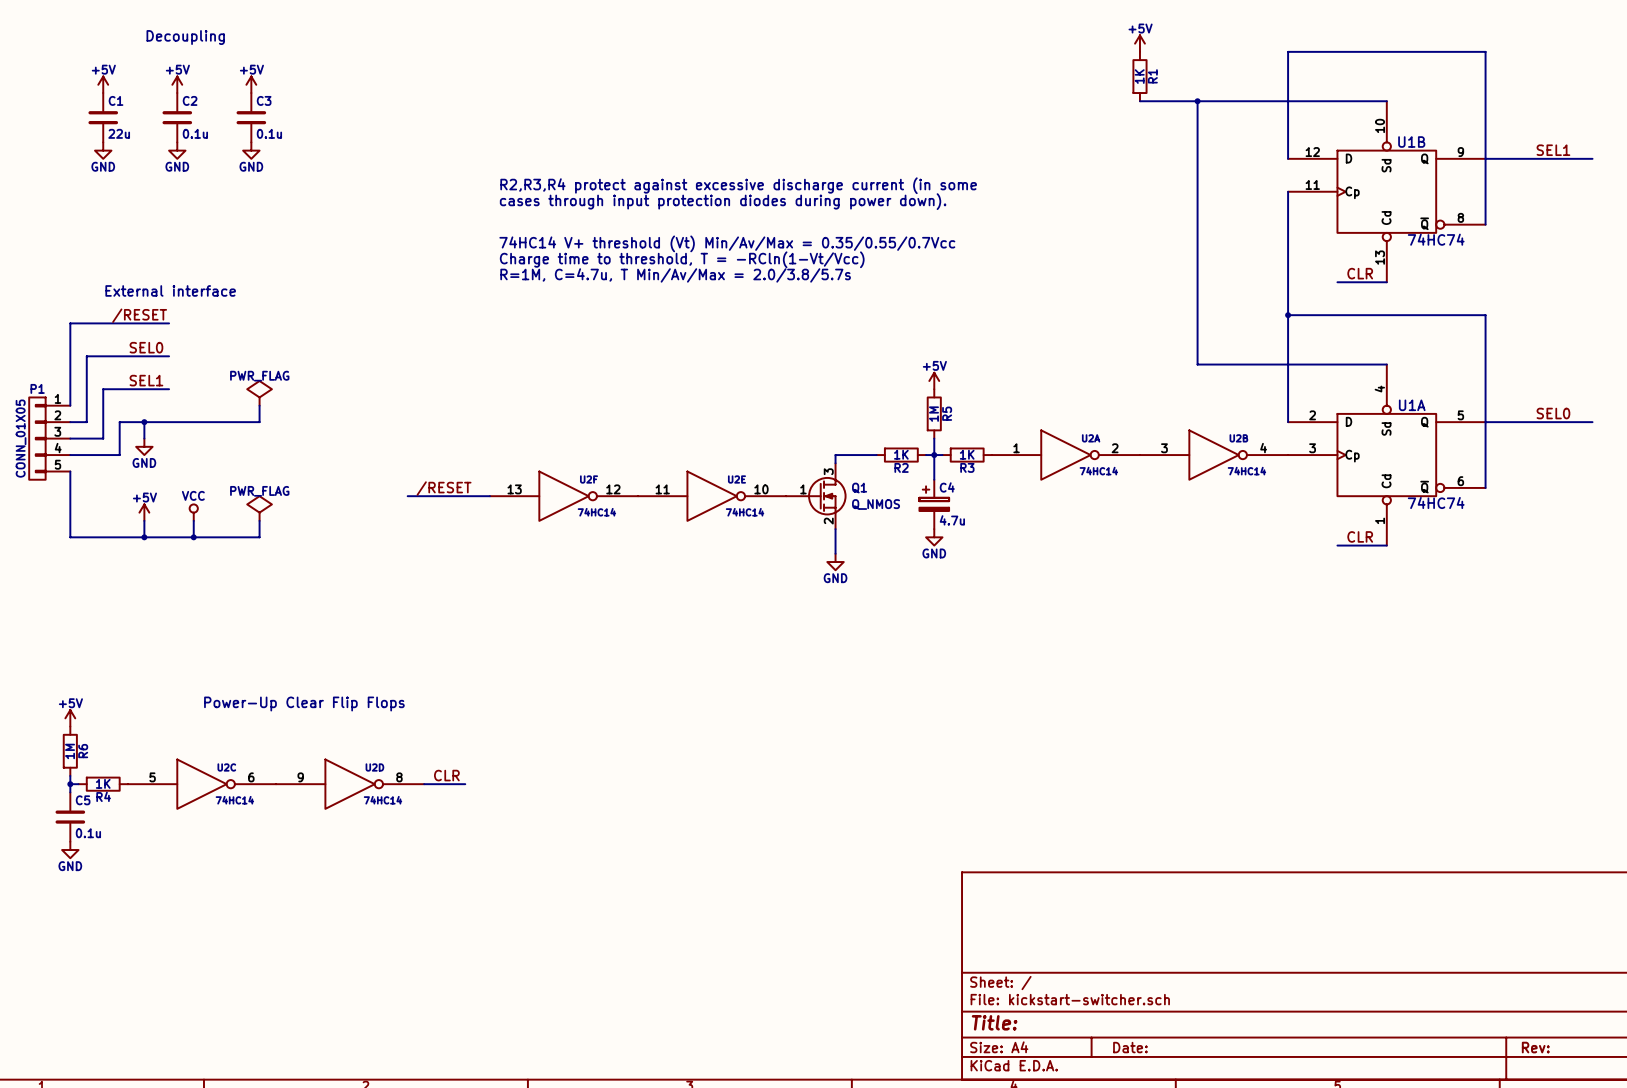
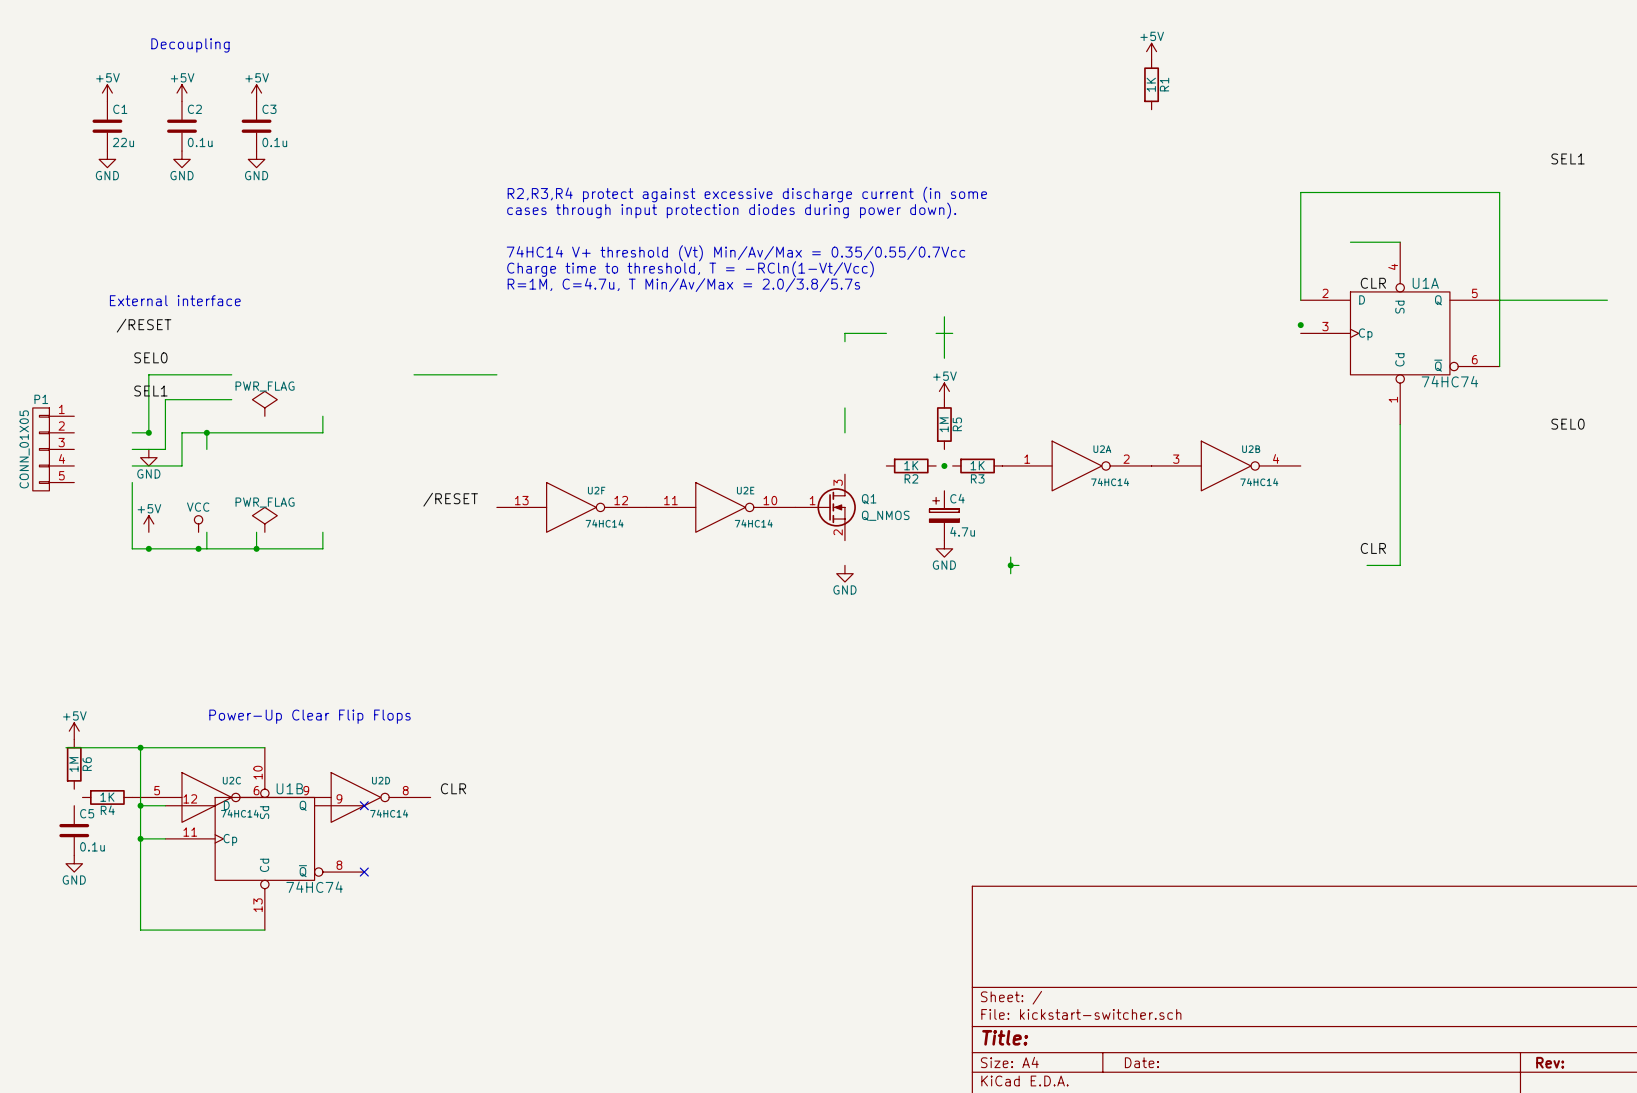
wire: (1139, 101) (1386, 101) -> none
wire: (1197, 101) (1197, 364) (1386, 364) -> none
junction: (1197, 101) -> none
wire: (1288, 158) (1288, 51) (1485, 51) (1485, 183) -> (1300, 200) (1300, 192) (1499, 192)
wire: (1485, 158) (1592, 158) -> none
U1B position: (1386, 191) -> (264, 838)
wire: (1288, 290) (1288, 422) -> none
wire: (1288, 315) (1485, 315) -> (1499, 233) (1499, 325)
wire: (169, 323) (70, 323) (70, 405) -> none
wire: (169, 356) (86, 356) (86, 422) (70, 422) -> none
wire: (1485, 356) (1485, 487) -> none
wire: none -> (231, 374) (148, 374) (148, 432)
wire: (160, 389) (103, 389) (103, 438) (70, 438) -> (165, 399) (165, 449) (132, 449)
wire: none -> (173, 399) (231, 399)
wire: (259, 405) (259, 422) -> (322, 416) (322, 432) (264, 432)
wire: none -> (1400, 424) (1400, 565) (1367, 565)
wire: (127, 422) (119, 422) (119, 455) (70, 455) -> none
wire: (177, 422) (144, 422) (144, 438) -> (181, 432) (181, 465) (132, 465)
wire: none -> (206, 432) (206, 449)
junction: none -> (206, 432)
wire: (1485, 422) (1592, 422) -> (1499, 300) (1607, 300)
wire: (934, 438) (934, 479) -> (944, 316) (944, 358)
wire: (876, 455) (835, 455) (835, 463) -> (886, 333) (844, 333) (844, 341)
wire: (926, 455) (942, 455) -> (936, 333) (952, 333)
U1A position: (1386, 455) -> (1400, 333)
wire: (70, 471) (70, 537) (127, 537) -> (132, 482) (132, 548)
wire: (407, 496) (489, 496) -> (414, 374) (496, 374)
wire: (144, 520) (144, 537) -> (206, 532) (206, 548)
wire: (193, 520) (193, 537) -> (256, 532) (256, 548)
wire: (259, 520) (259, 537) -> (322, 532) (322, 548) (264, 548)
wire: (835, 529) (835, 553) -> (844, 407) (844, 432)
junction: none -> (256, 548)
wire: none -> (1010, 557) (1010, 573)
wire: (1337, 545) (1386, 545) -> none
wire: none -> (1010, 565) (1018, 565)
junction: none -> (1010, 565)
wire: none -> (65, 747) (264, 747)
wire: none -> (140, 747) (140, 930) (264, 930)
junction: none -> (140, 747)
wire: (70, 775) (70, 792) -> none
wire: (70, 784) (78, 784) -> none
junction: (70, 784) -> none
wire: (424, 784) (465, 784) -> none
wire: none -> (140, 805) (165, 805)
junction: none -> (140, 805)
no-connect mark: none -> (364, 805)
wire: none -> (140, 838) (165, 838)
junction: none -> (140, 838)
no-connect mark: none -> (364, 872)

